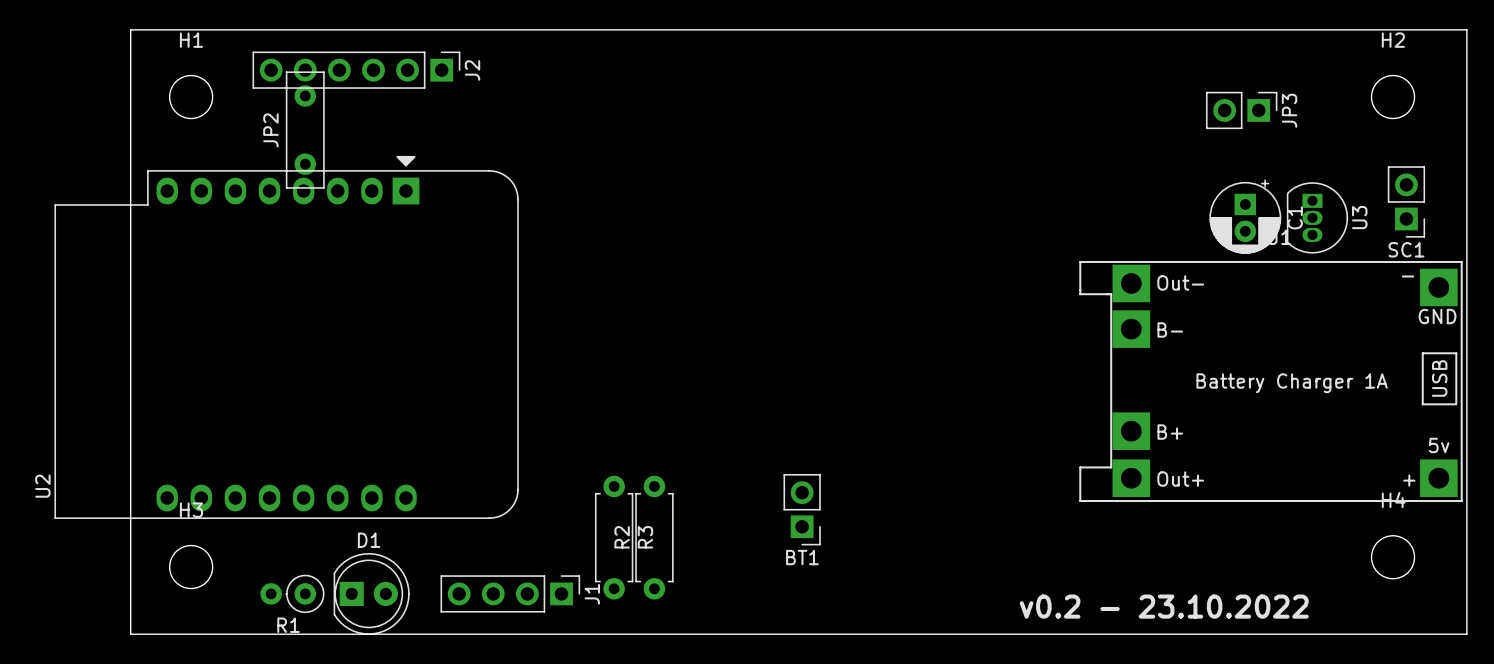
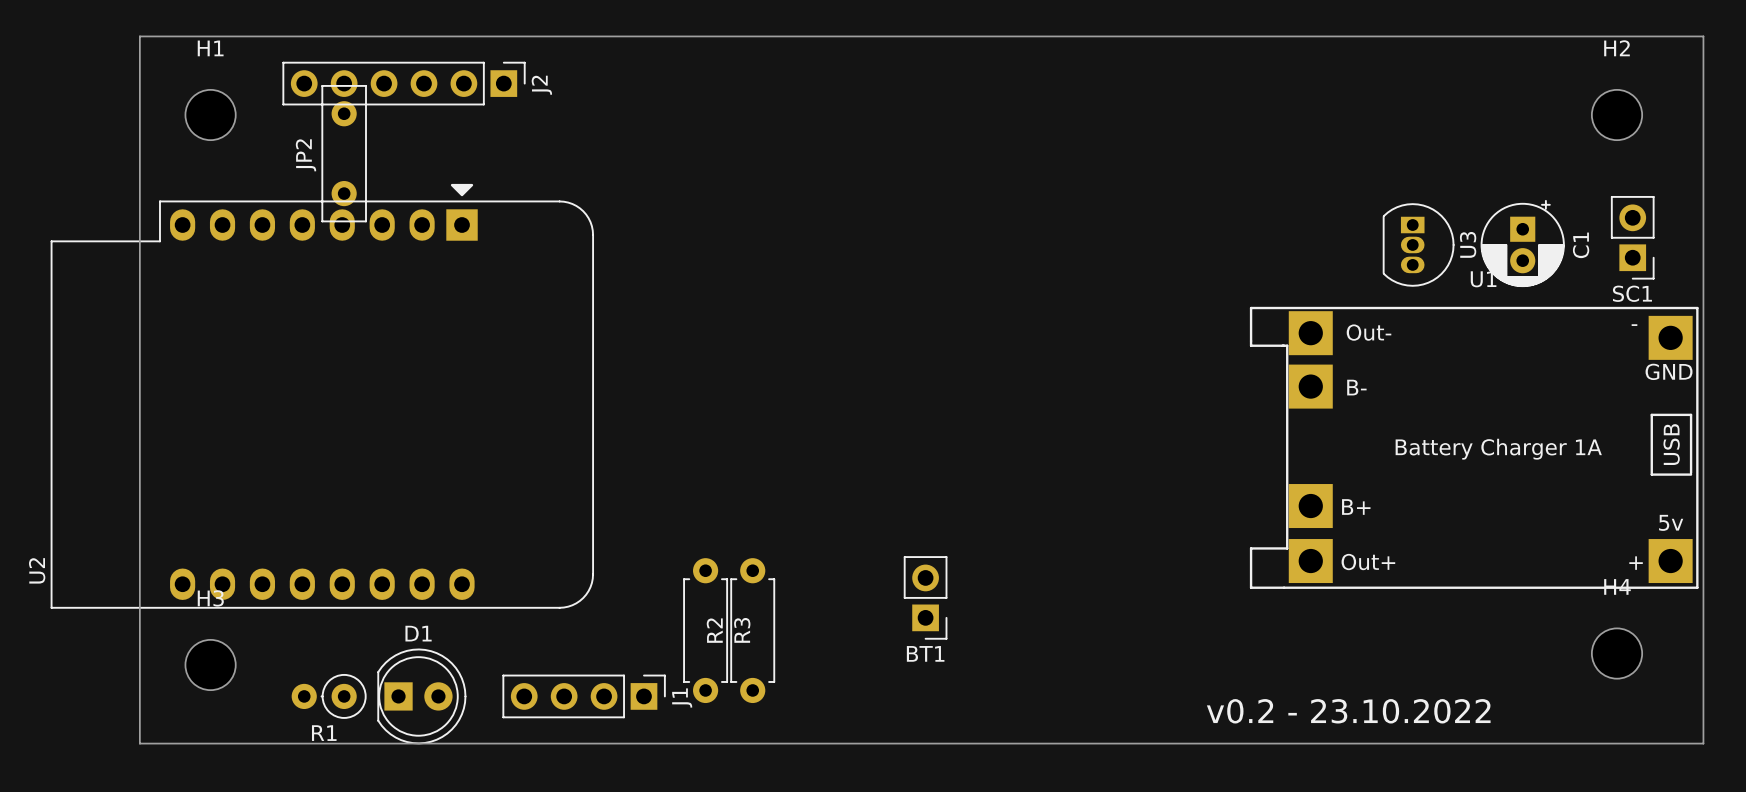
JP3: (1241, 110) -> none
C1 position: (1245, 216) -> (1522, 243)
U3 position: (1317, 217) -> (1418, 244)

